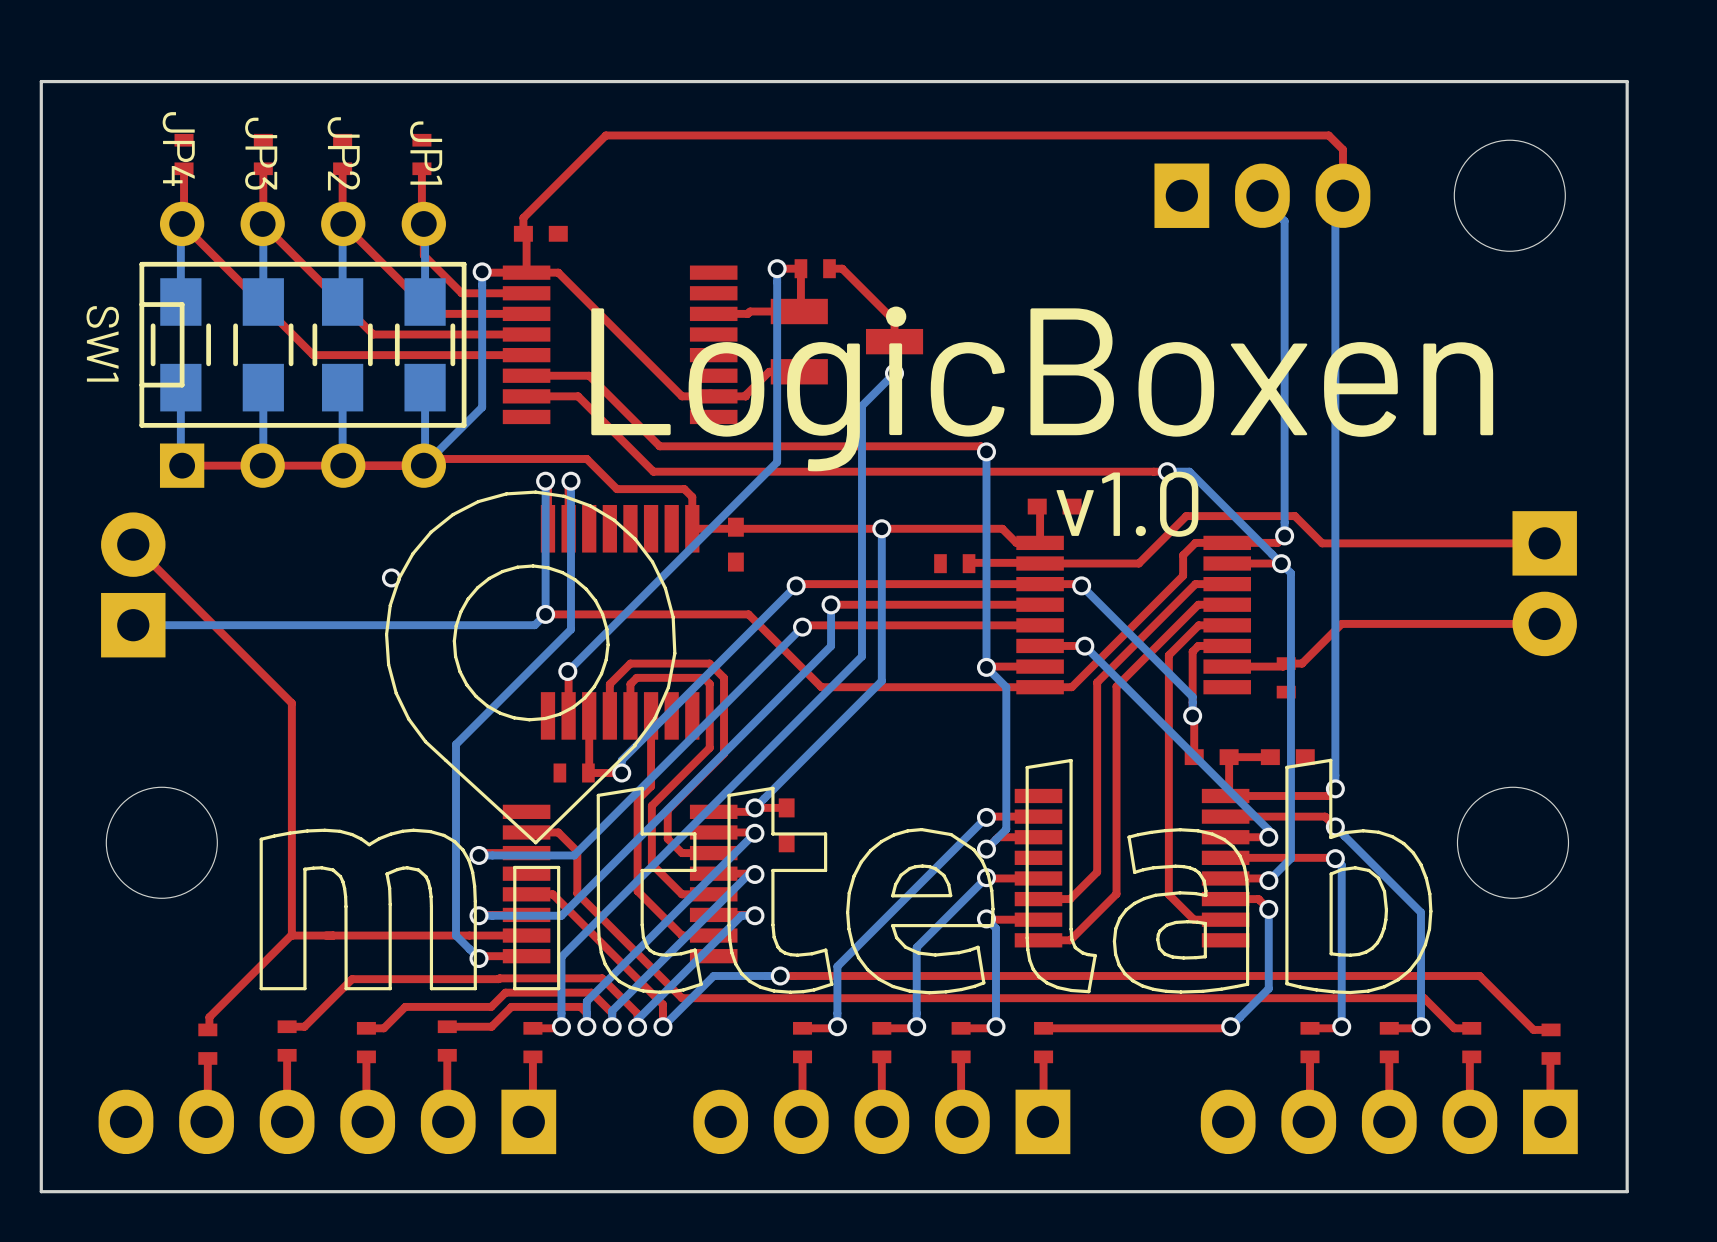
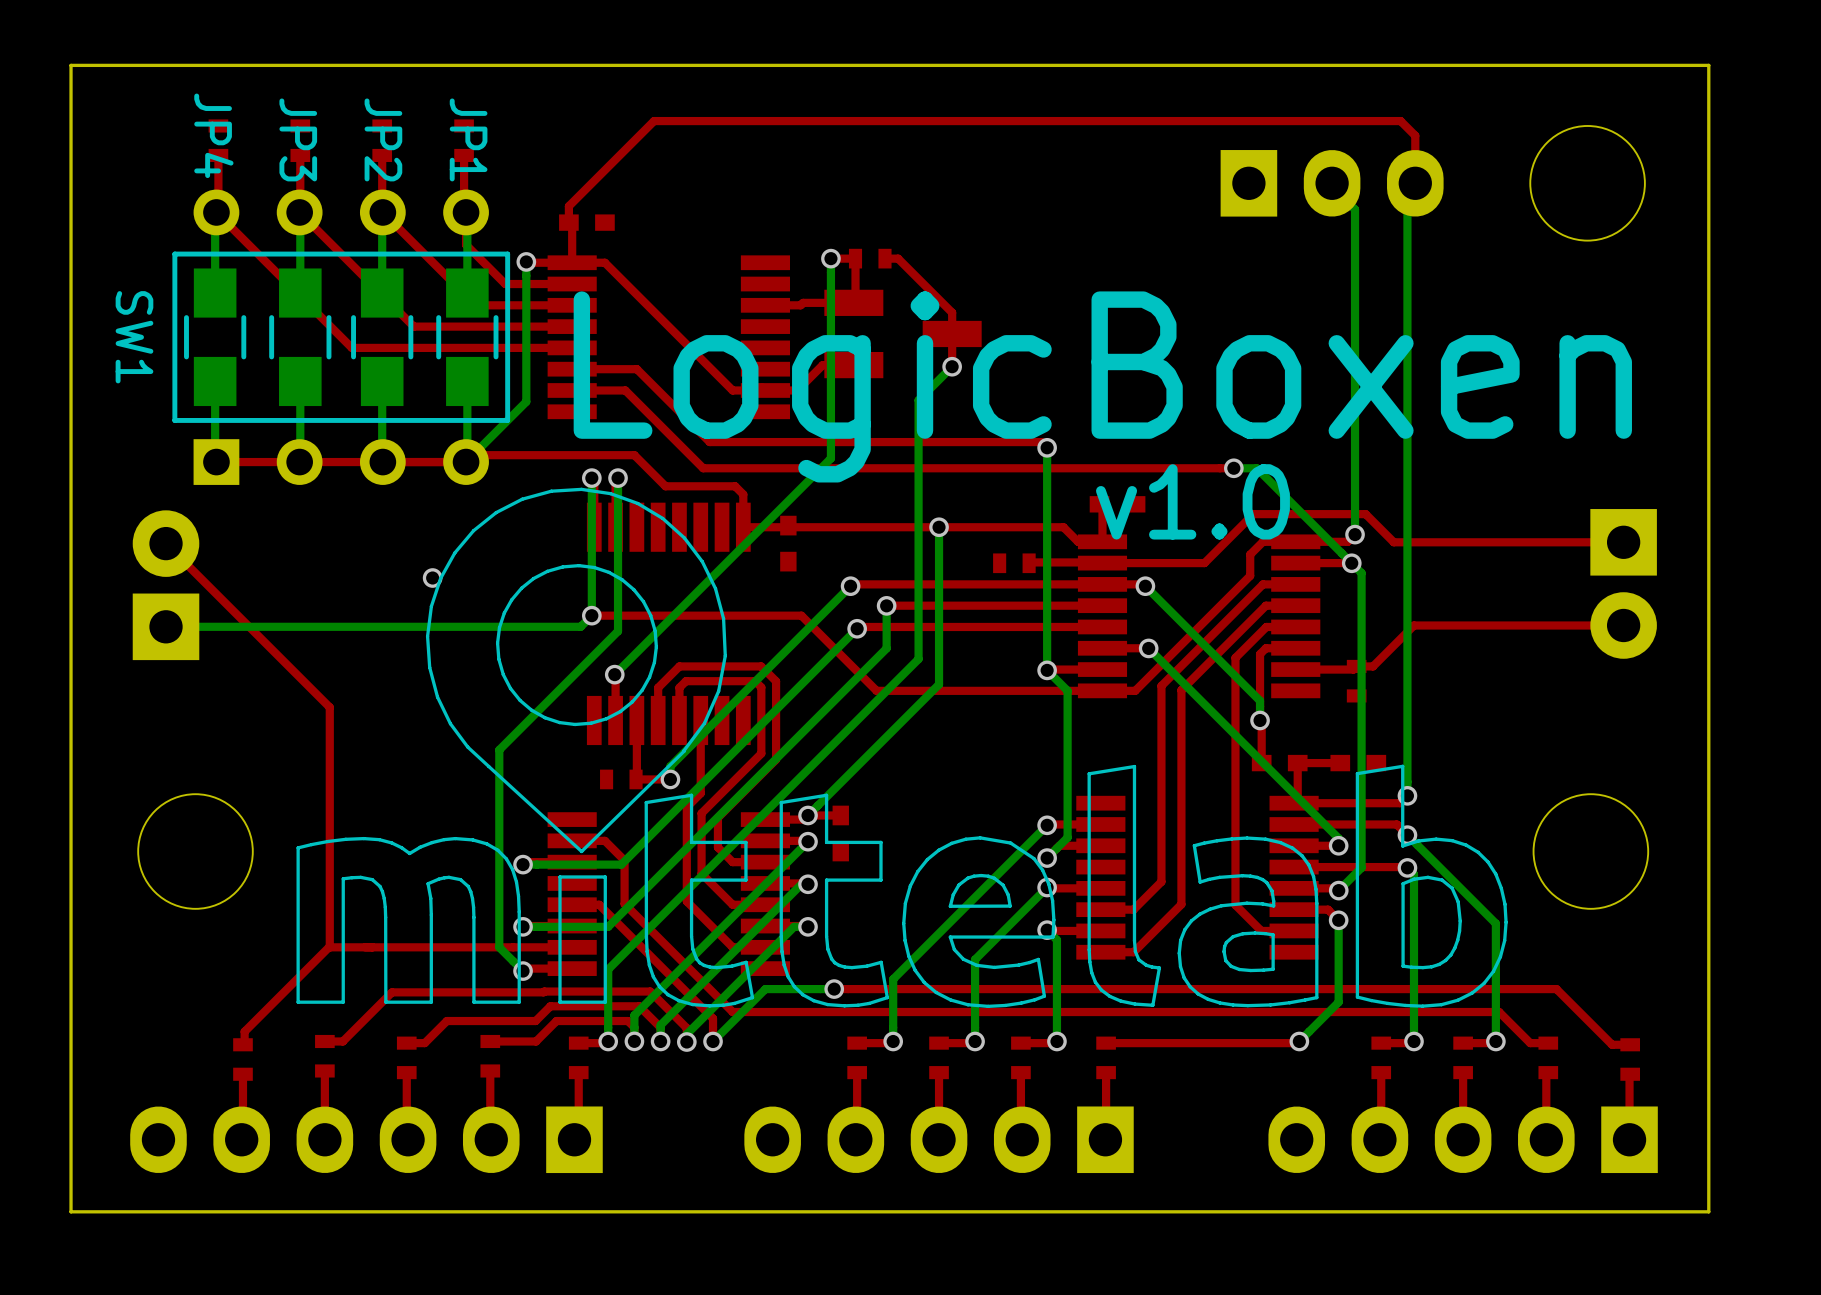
SW1 footprint: [139, 201, 467, 488] -> [172, 189, 511, 485]

